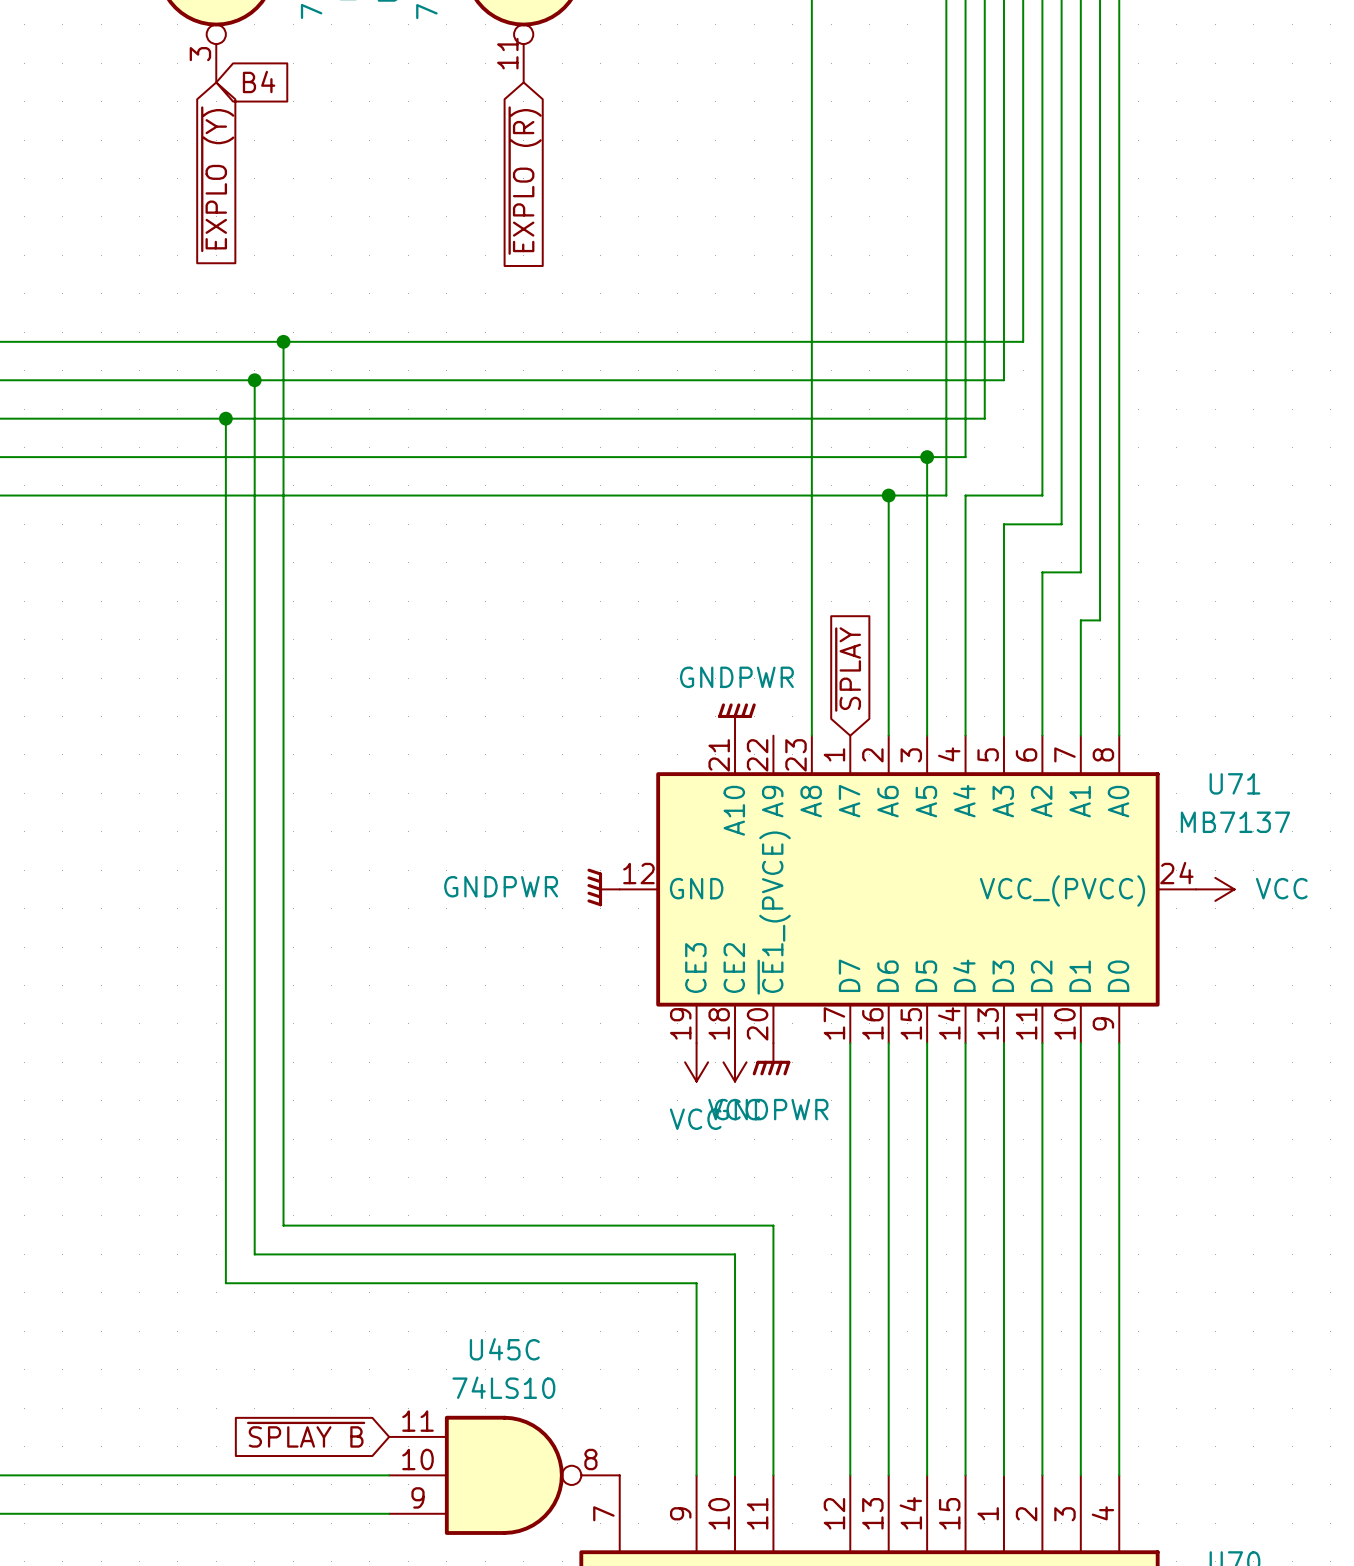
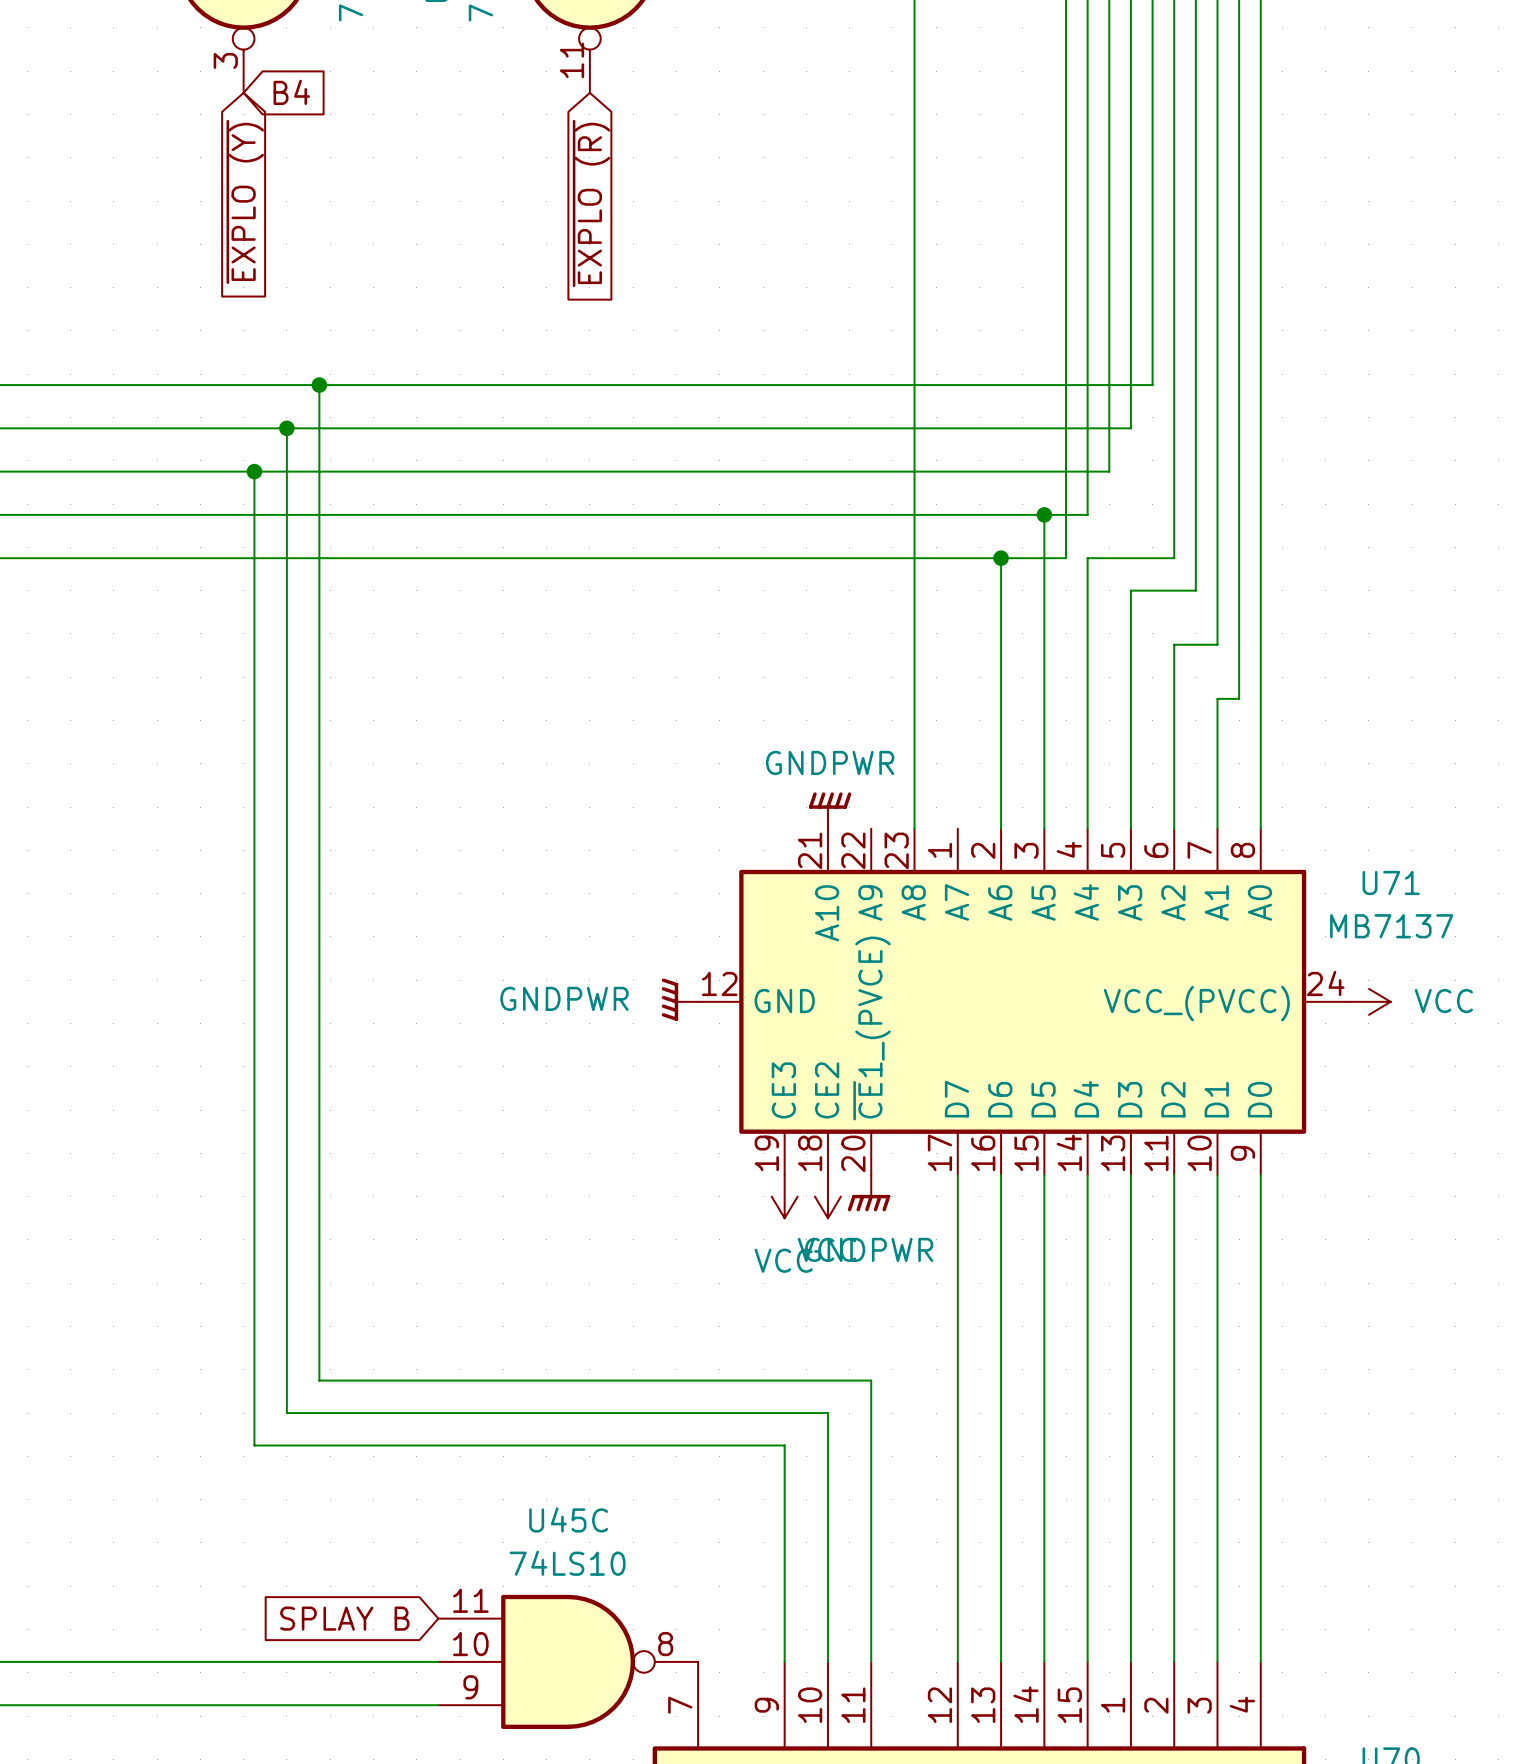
global label: ~{SPLAY} (848, 669) -> none
global label: ~{SPLAY B} (306, 1434) -> SPLAY B (344, 1618)

